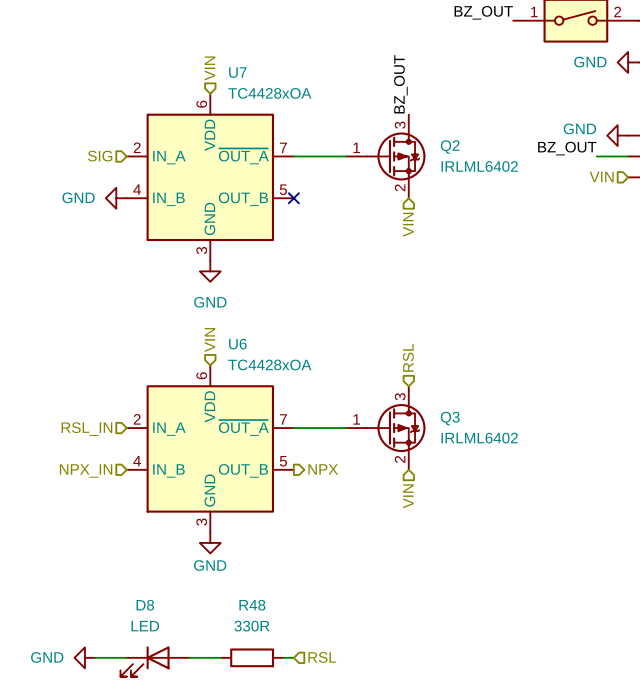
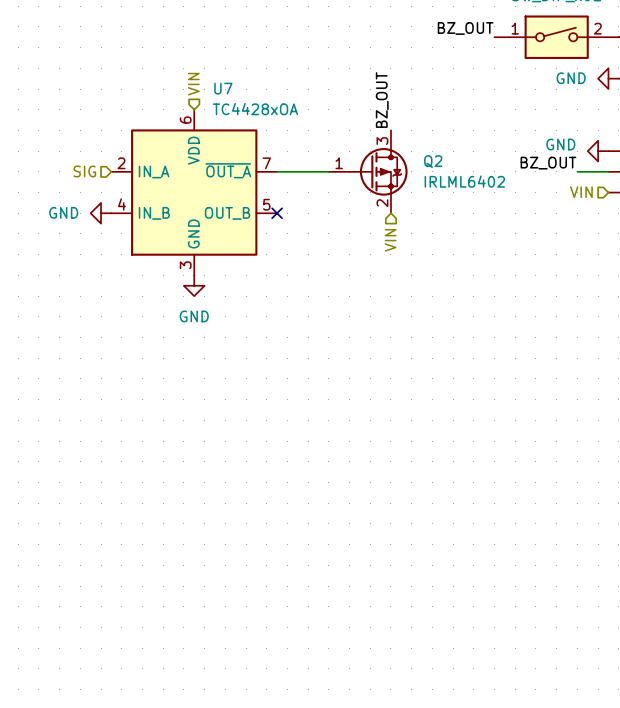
hierarchical label: VIN (209, 340) -> none
hierarchical label: RSL (408, 357) -> none
wire: (293, 428) (346, 428) -> none
Q3: IRLML6402 (385, 428) -> none
hierarchical label: RSL_IN (86, 429) -> none
U6: TC4428xOA (210, 448) -> none
hierarchical label: NPX (323, 469) -> none
hierarchical label: NPX_IN (86, 470) -> none
hierarchical label: VIN (408, 496) -> none
power symbol: GND (210, 542) -> none
power symbol: GND (84, 657) -> none
wire: (95, 657) (126, 657) -> none
wire: (189, 657) (220, 657) -> none
R48: 330R (252, 657) -> none
wire: (283, 657) (293, 657) -> none
hierarchical label: RSL (322, 657) -> none
D8: LED (154, 661) -> none

